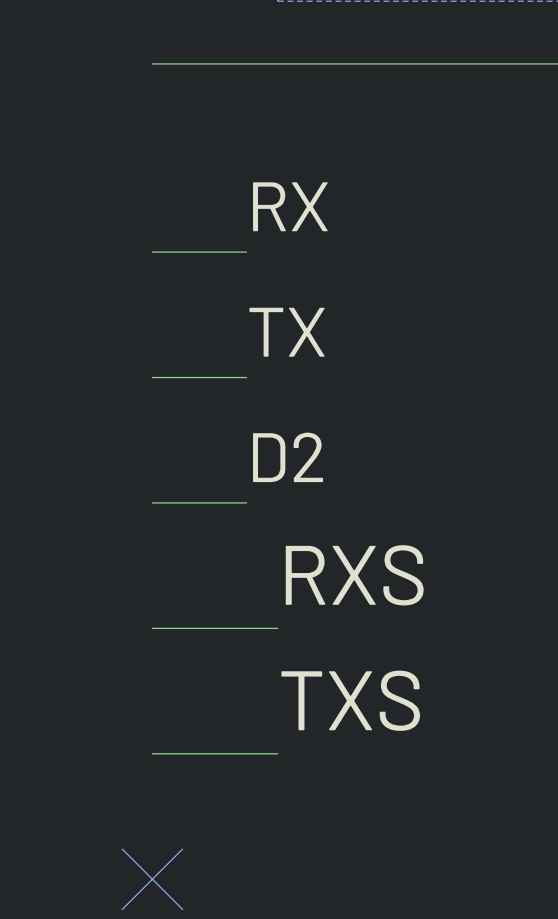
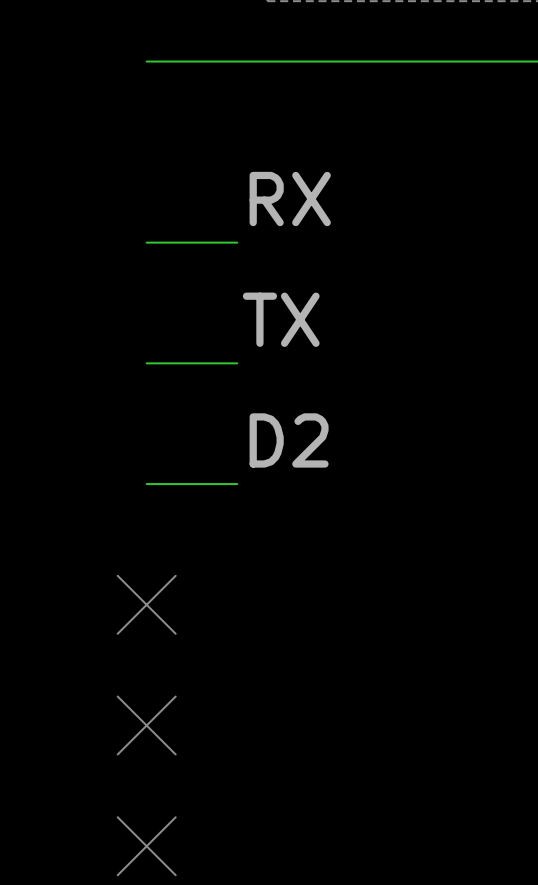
label: RXS (354, 575) -> none
wire: (152, 628) (277, 628) -> none
no-connect mark: none -> (146, 604)
label: TXS (350, 700) -> none
wire: (152, 753) (277, 753) -> none
no-connect mark: none -> (146, 725)

